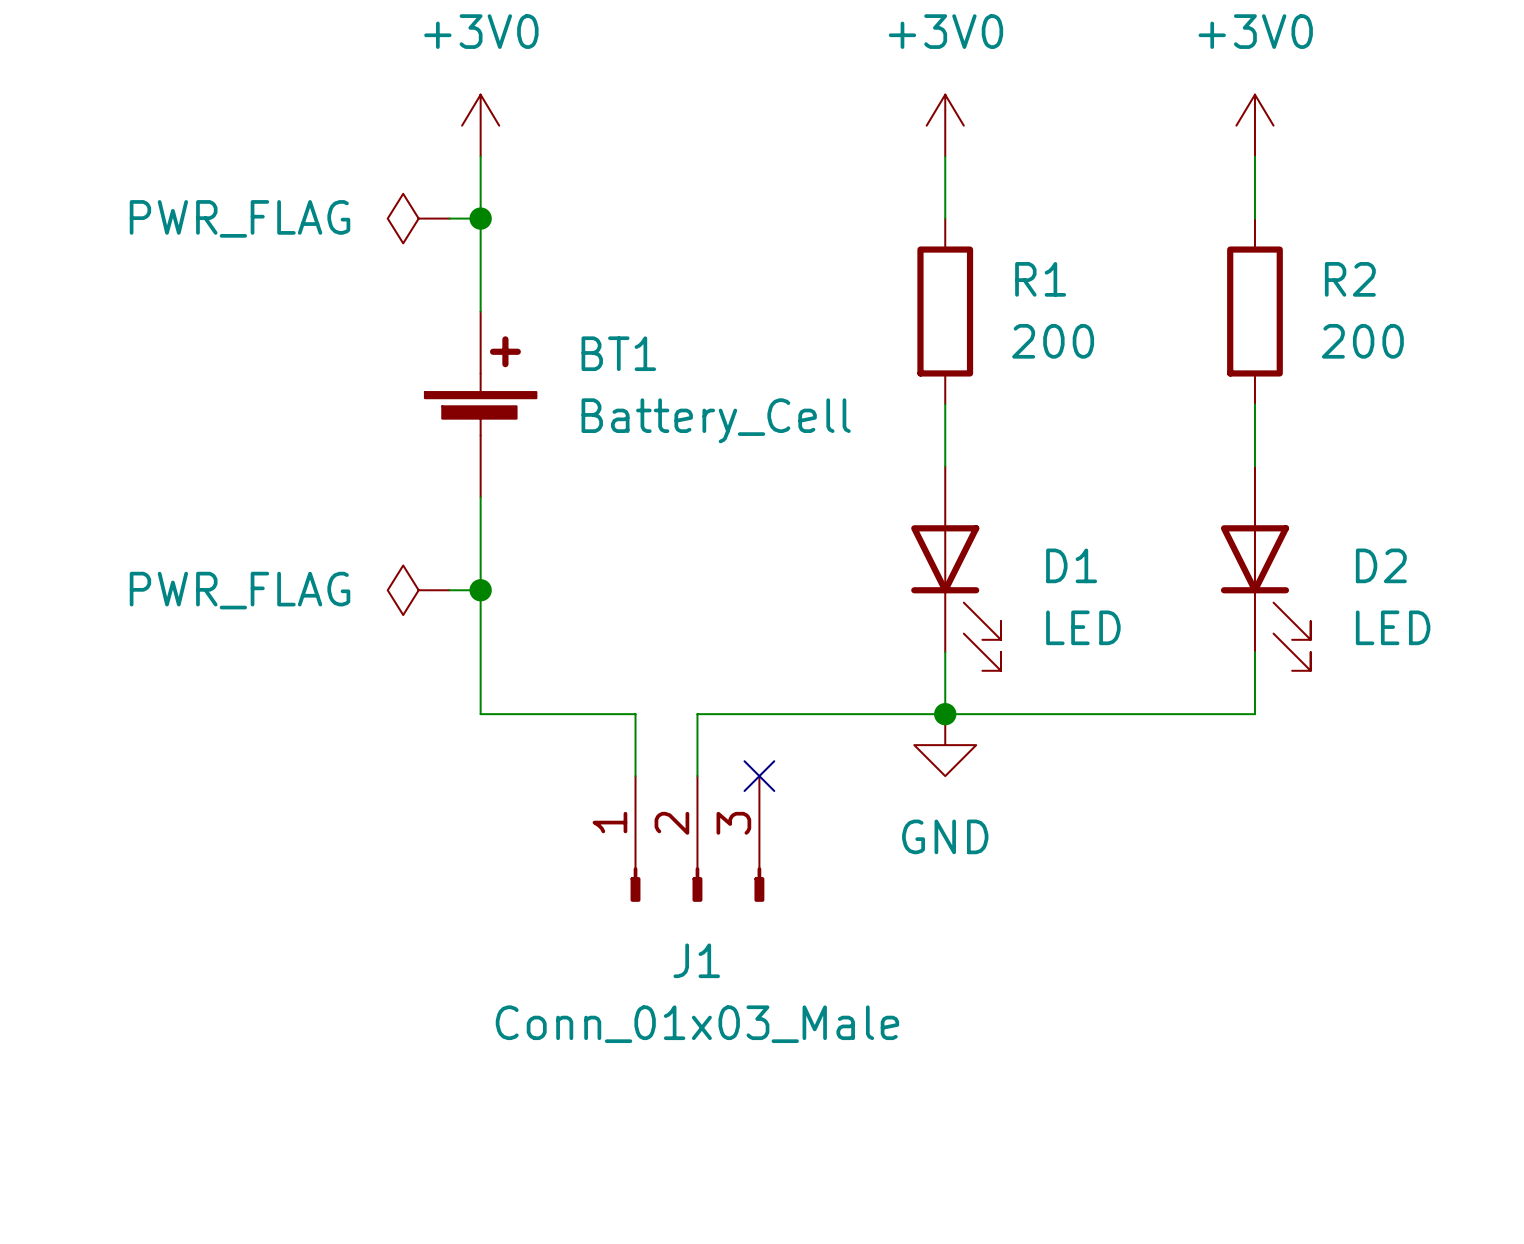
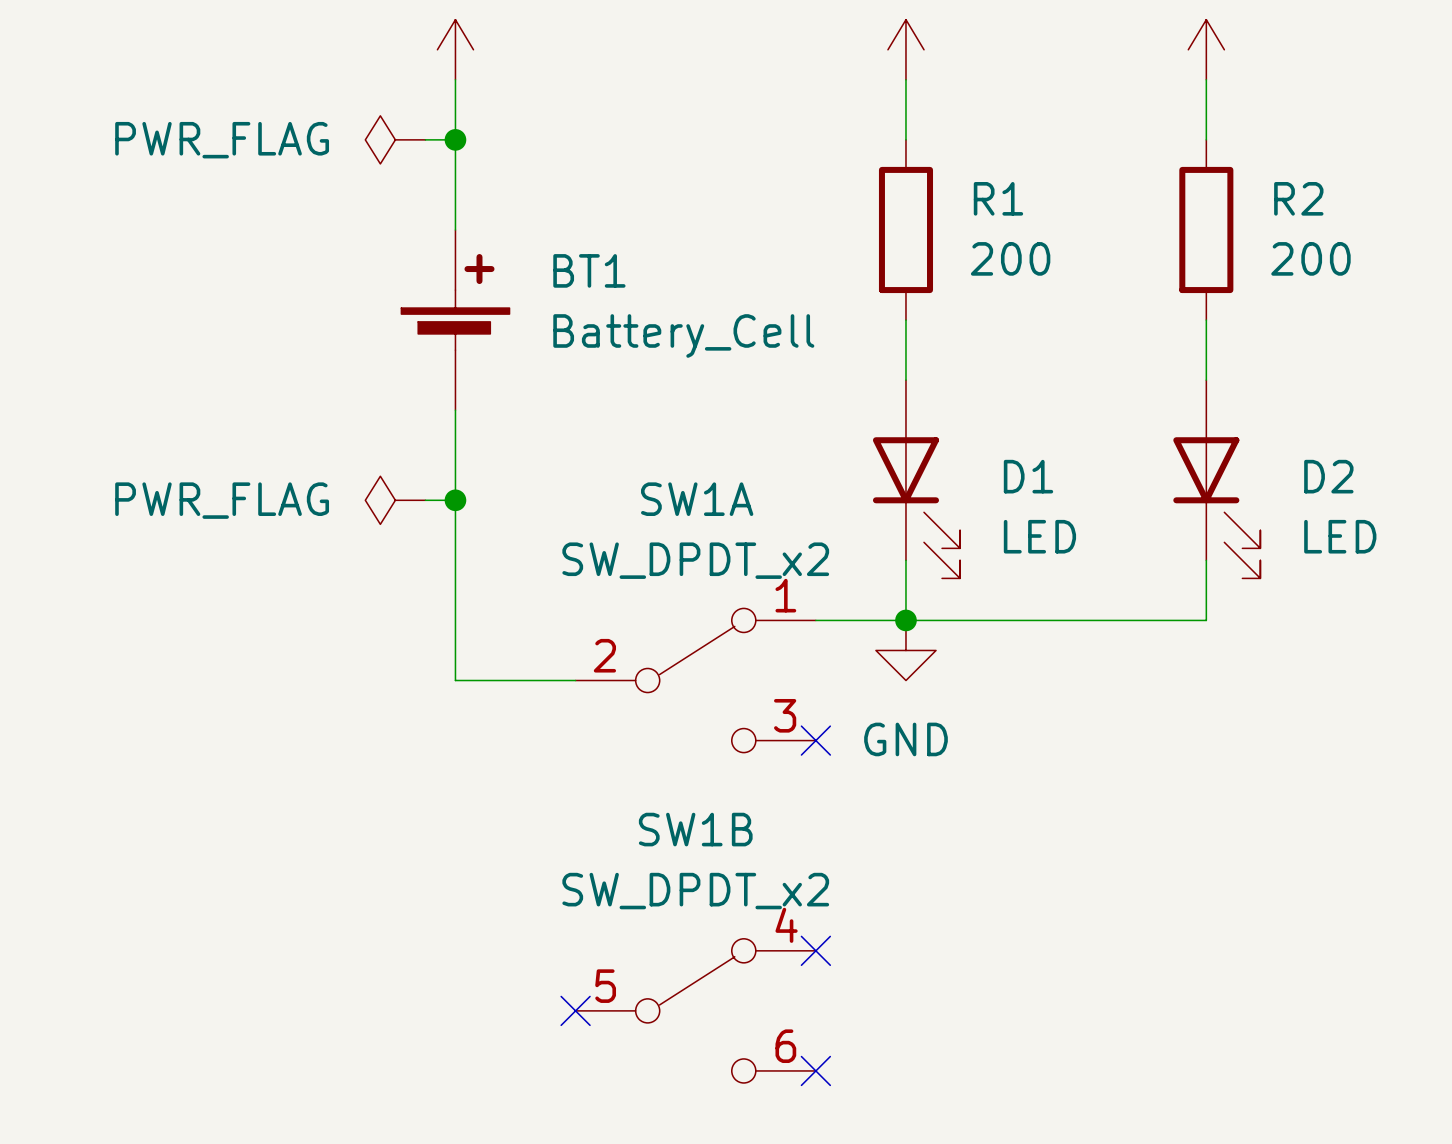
wire: (480, 714) (635, 714) (635, 776) -> (455, 620) (455, 680) (575, 680)
wire: (852, 714) (697, 714) (697, 776) -> none
SW1A: none -> SW_DPDT_x2 (695, 680)
no-connect mark position: (759, 776) -> (815, 740)
J1: Conn_01x03_Male (697, 838) -> none
no-connect mark: none -> (815, 950)
no-connect mark: none -> (575, 1010)
SW1B: none -> SW_DPDT_x2 (695, 1010)
no-connect mark: none -> (815, 1070)

